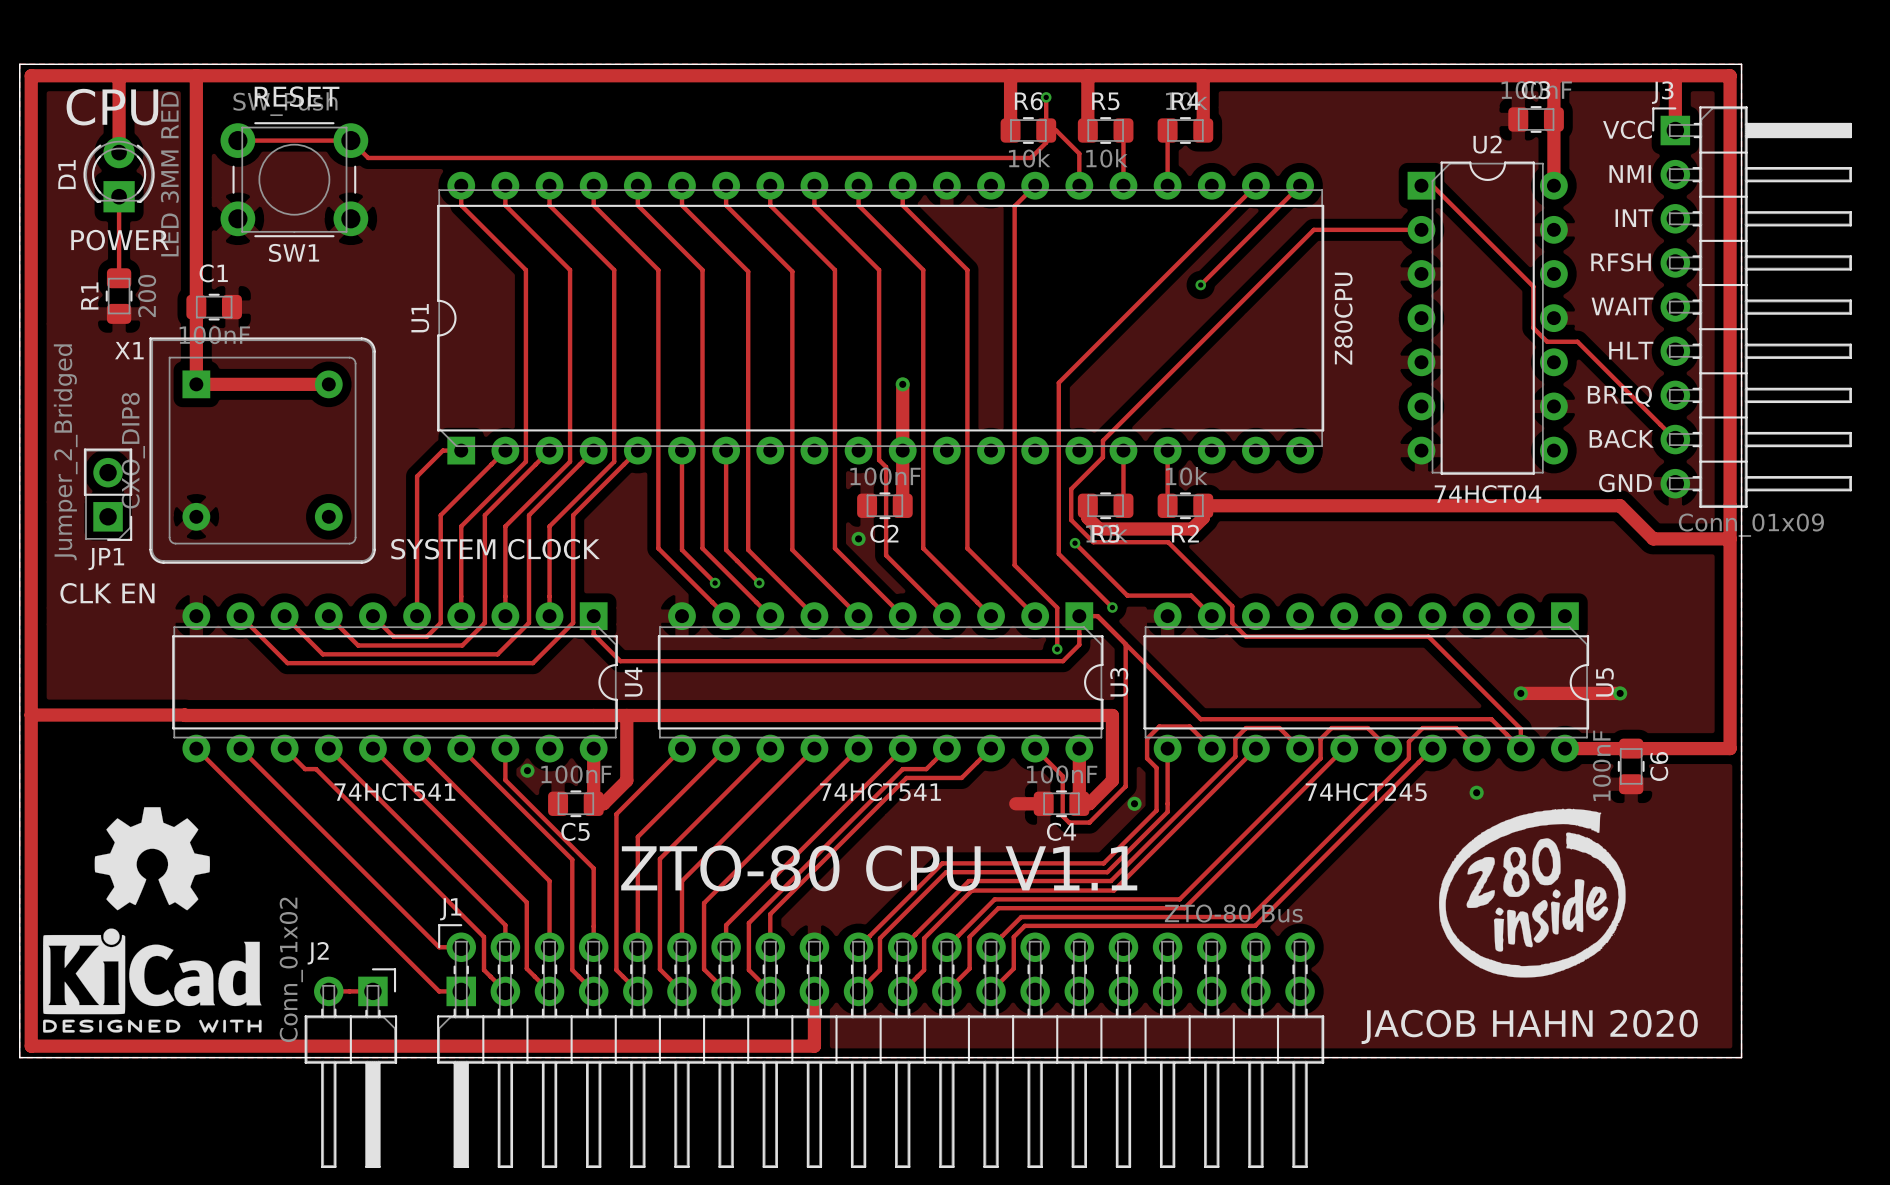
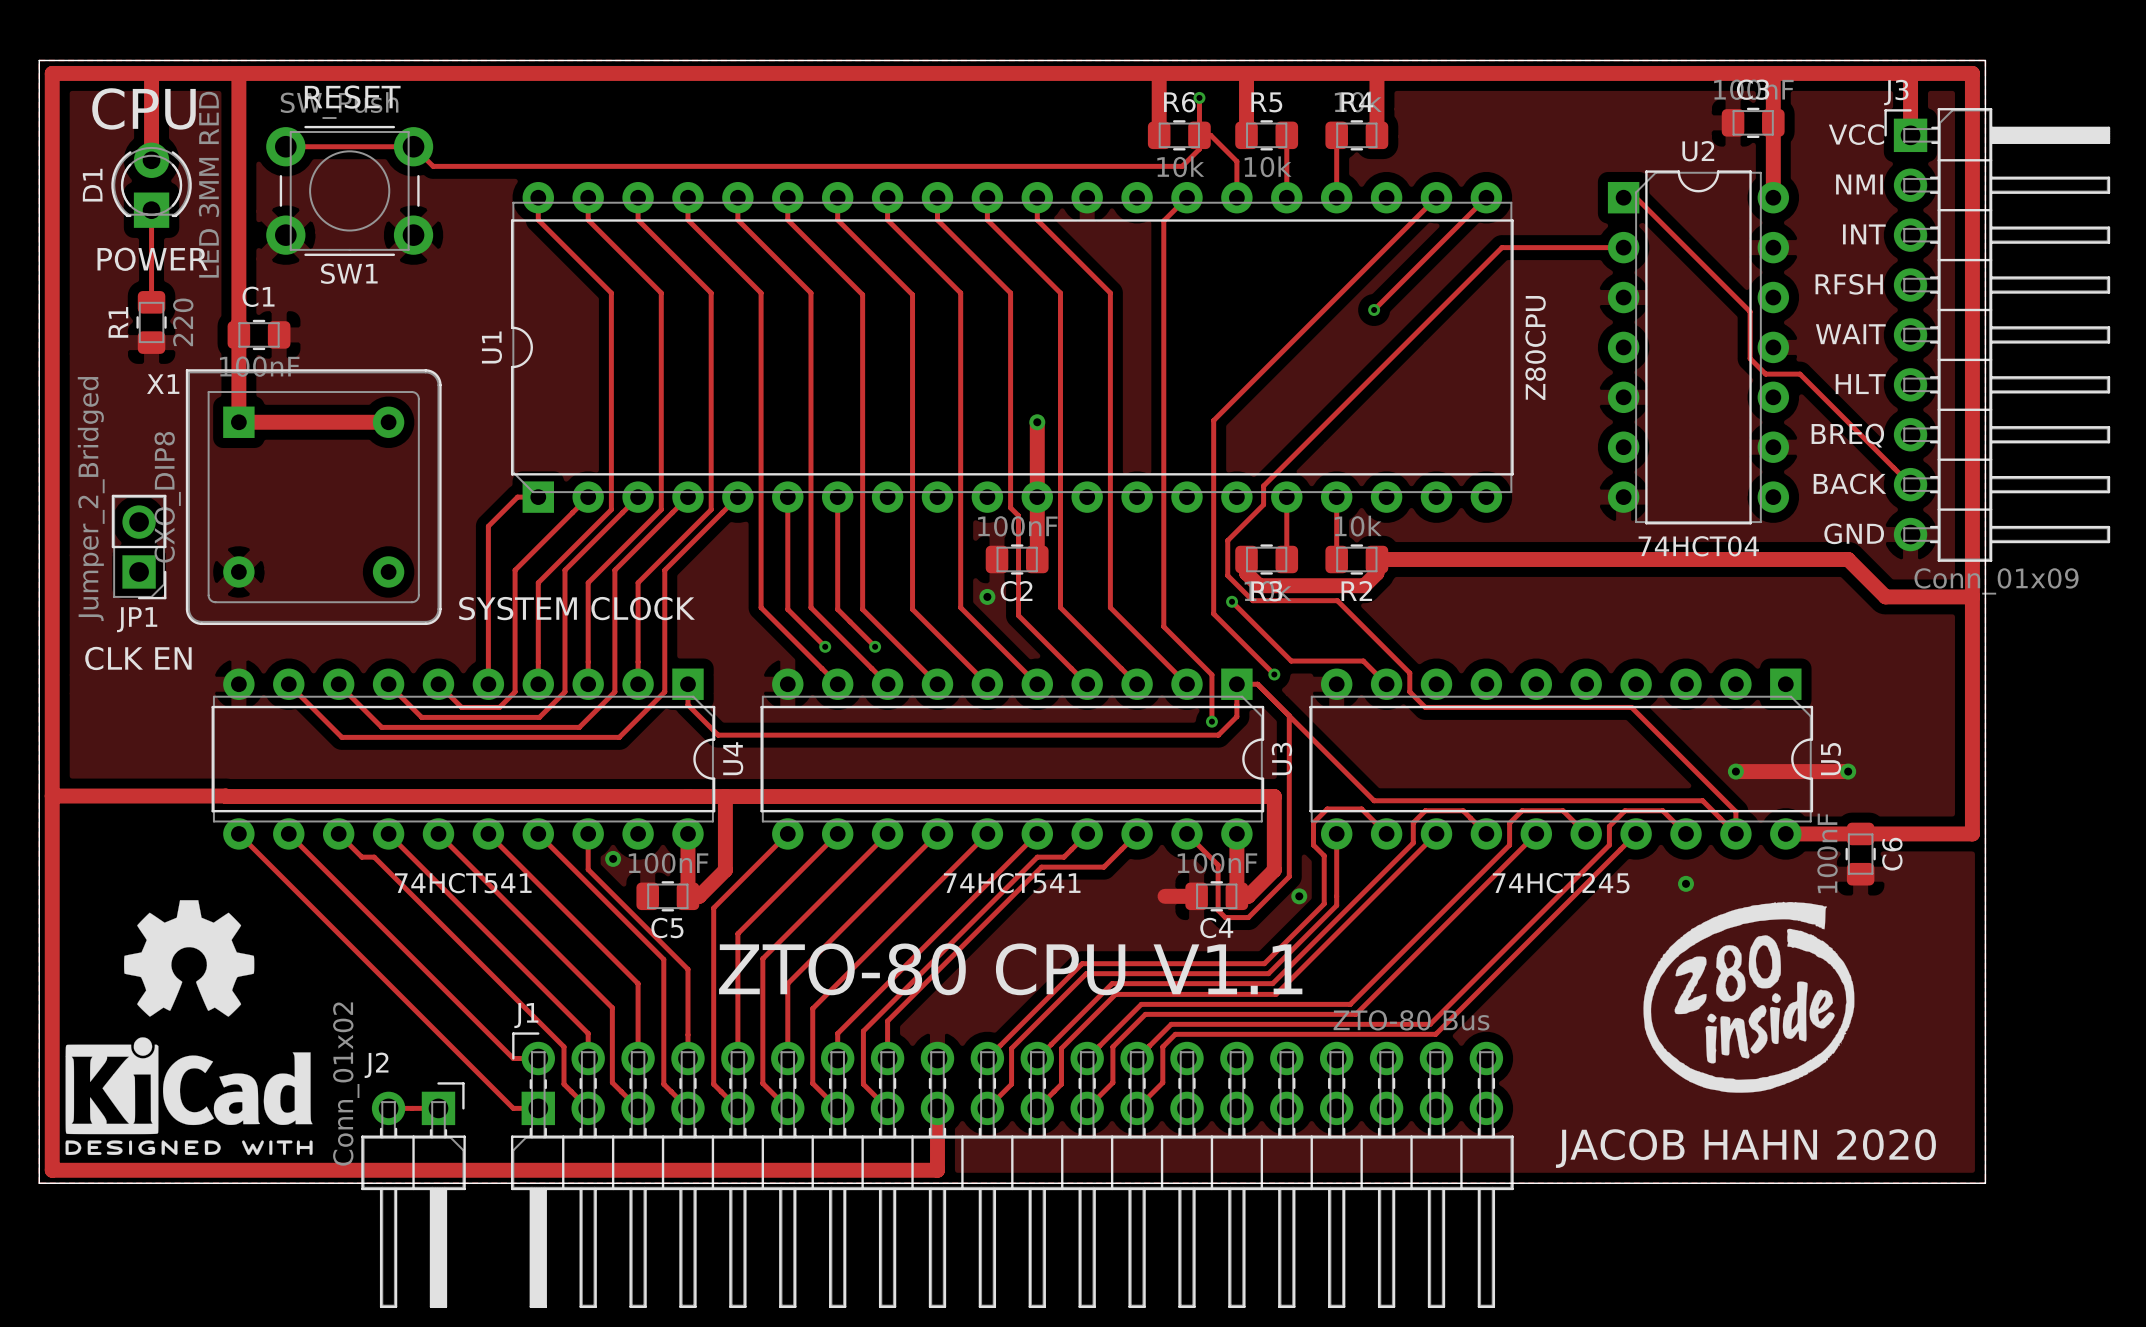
R1 value: 200 (147, 295) -> 220 (183, 322)

